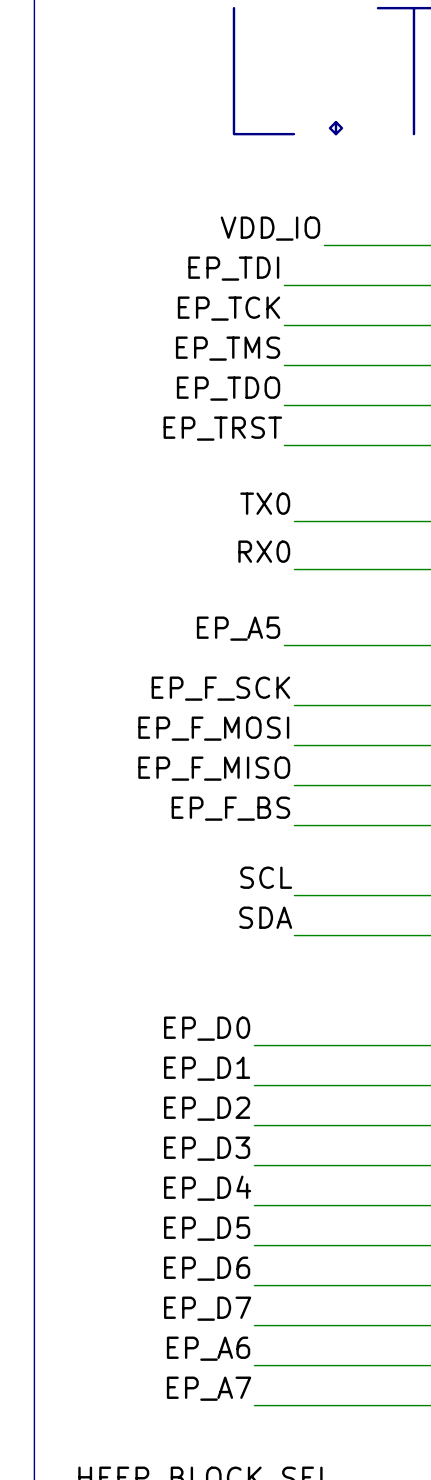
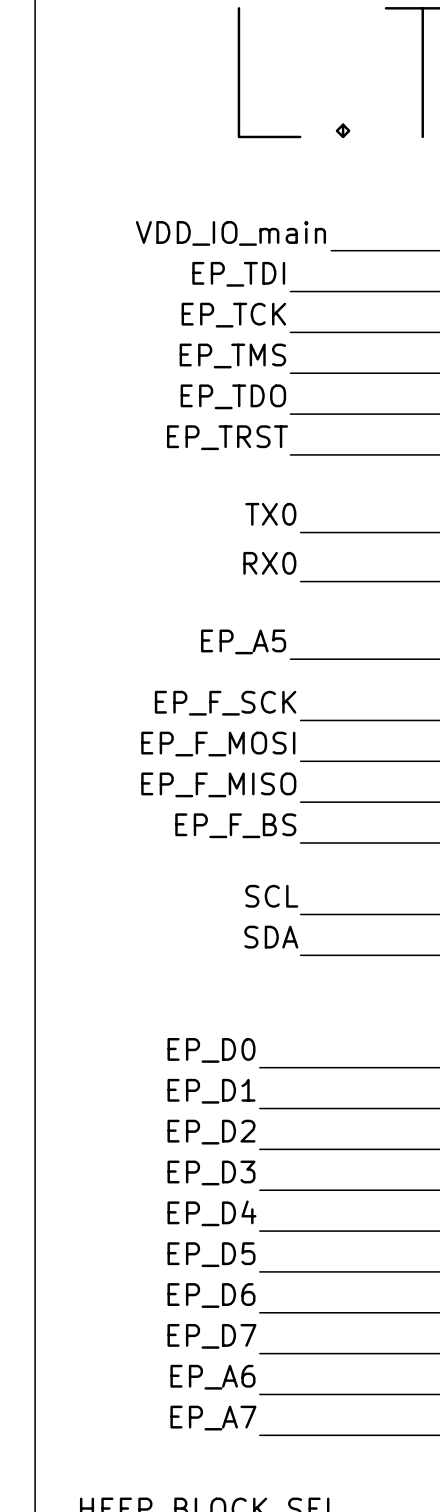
label: VDD_IO (270, 228) -> VDD_IO_main (230, 233)

